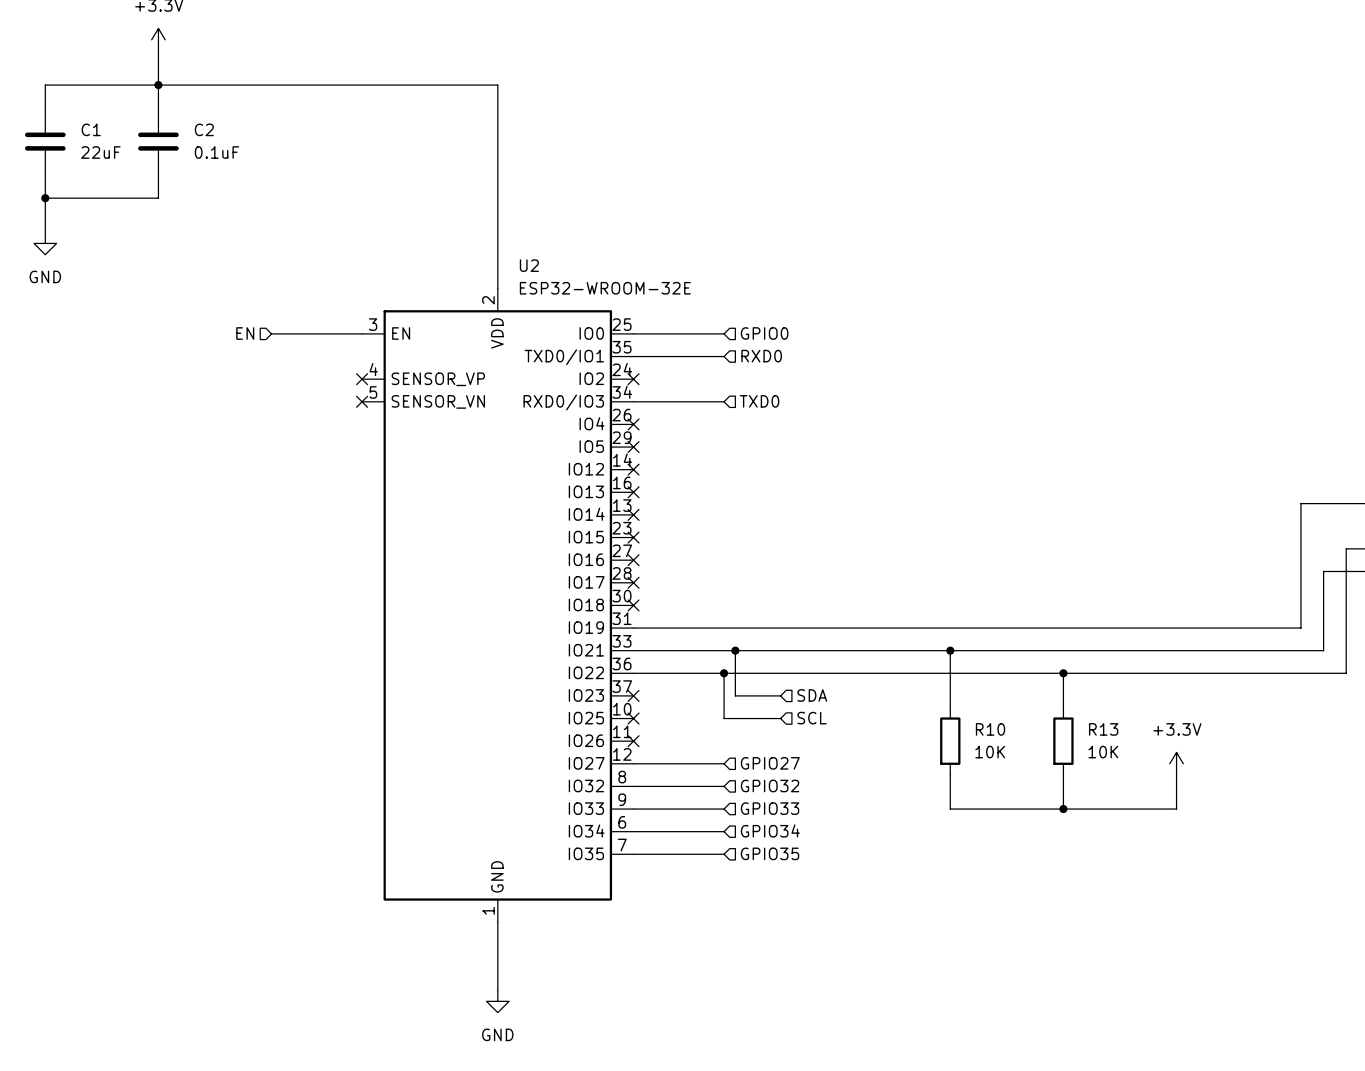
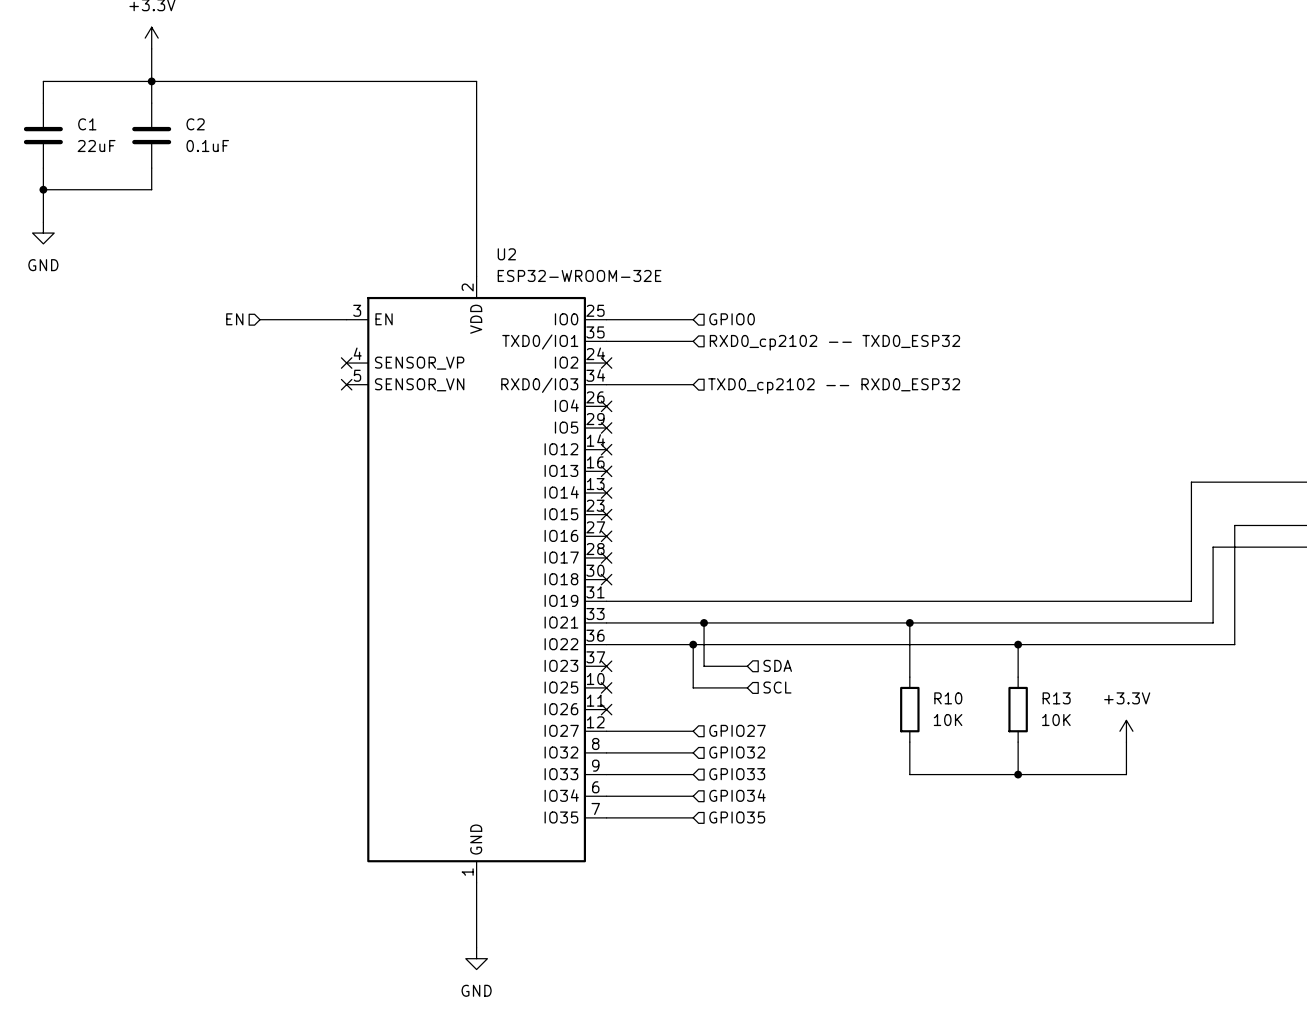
hierarchical label: RXD0 (761, 356) -> RXD0_cp2102 -- TXD0_ESP32 (834, 342)
hierarchical label: TXD0 (759, 401) -> TXD0_cp2102 -- RXD0_ESP32 (834, 386)
wire: (1300, 503) (1300, 628) (1244, 628) -> (1245, 482) (1191, 482) (1191, 601)
wire: (1346, 548) (1346, 673) (1289, 673) -> (1288, 525) (1234, 525) (1234, 644)
wire: (1323, 571) (1323, 650) (1267, 650) -> (1267, 547) (1213, 547) (1213, 622)

